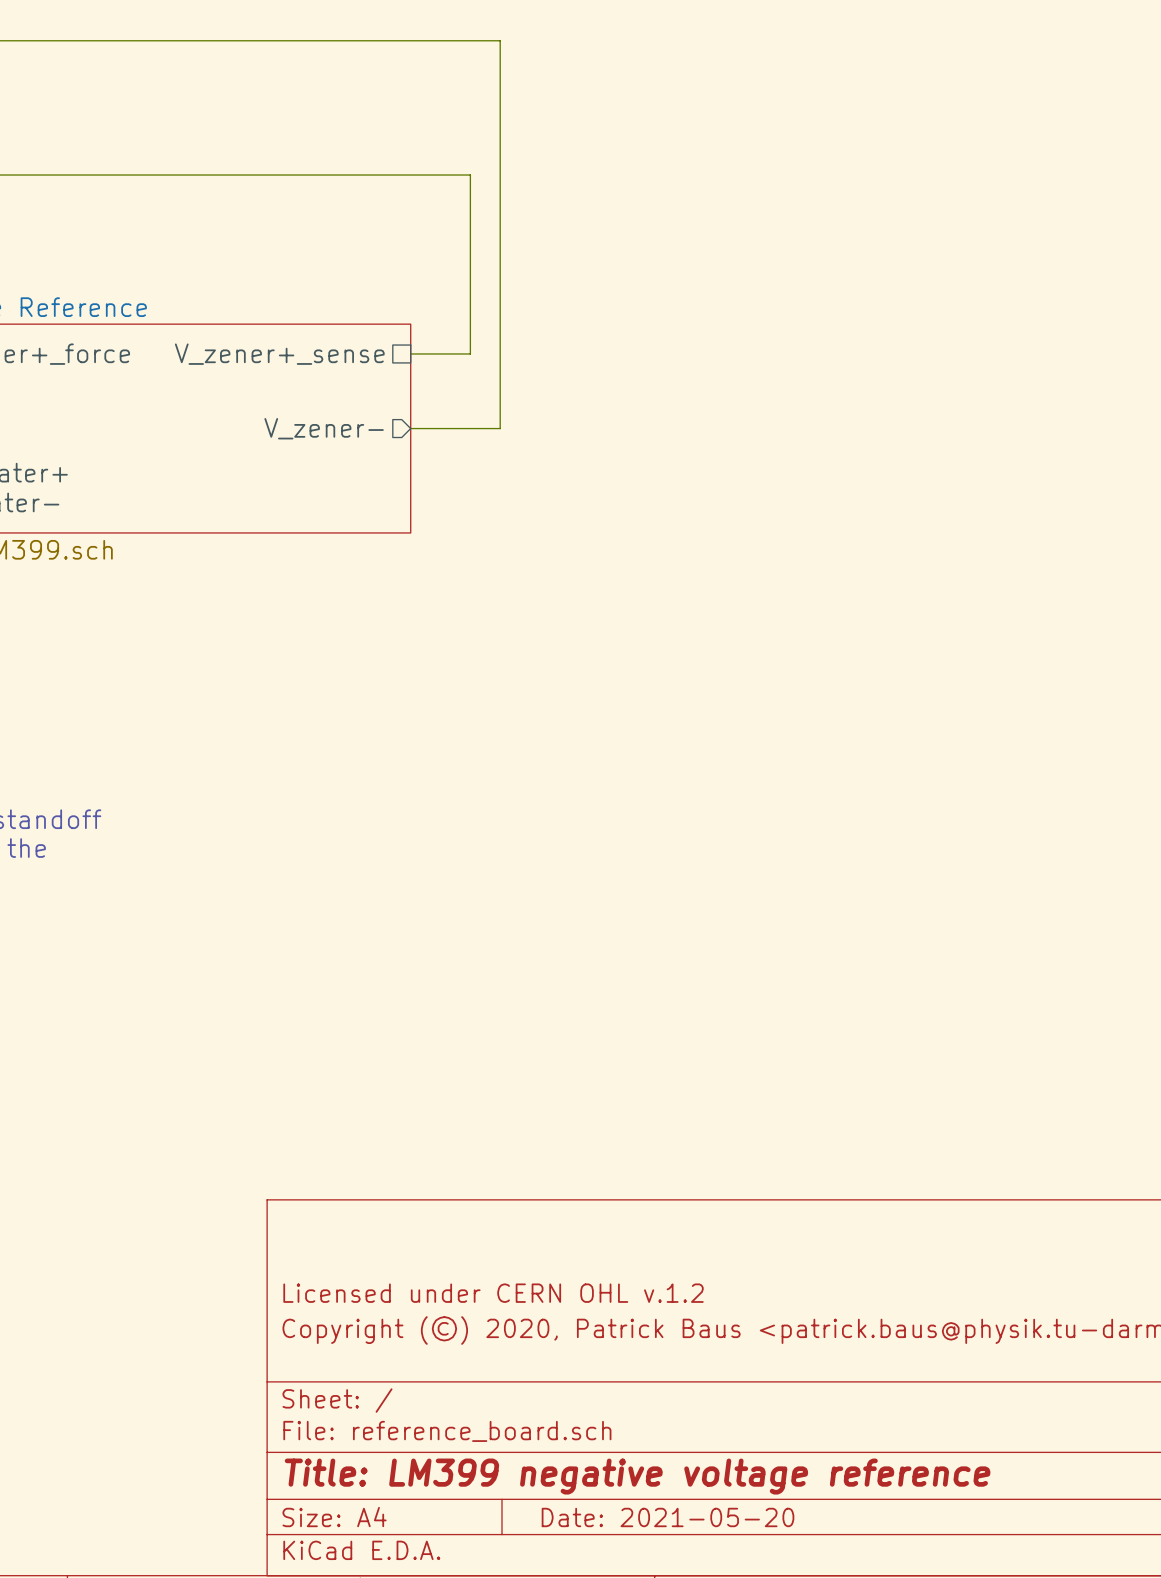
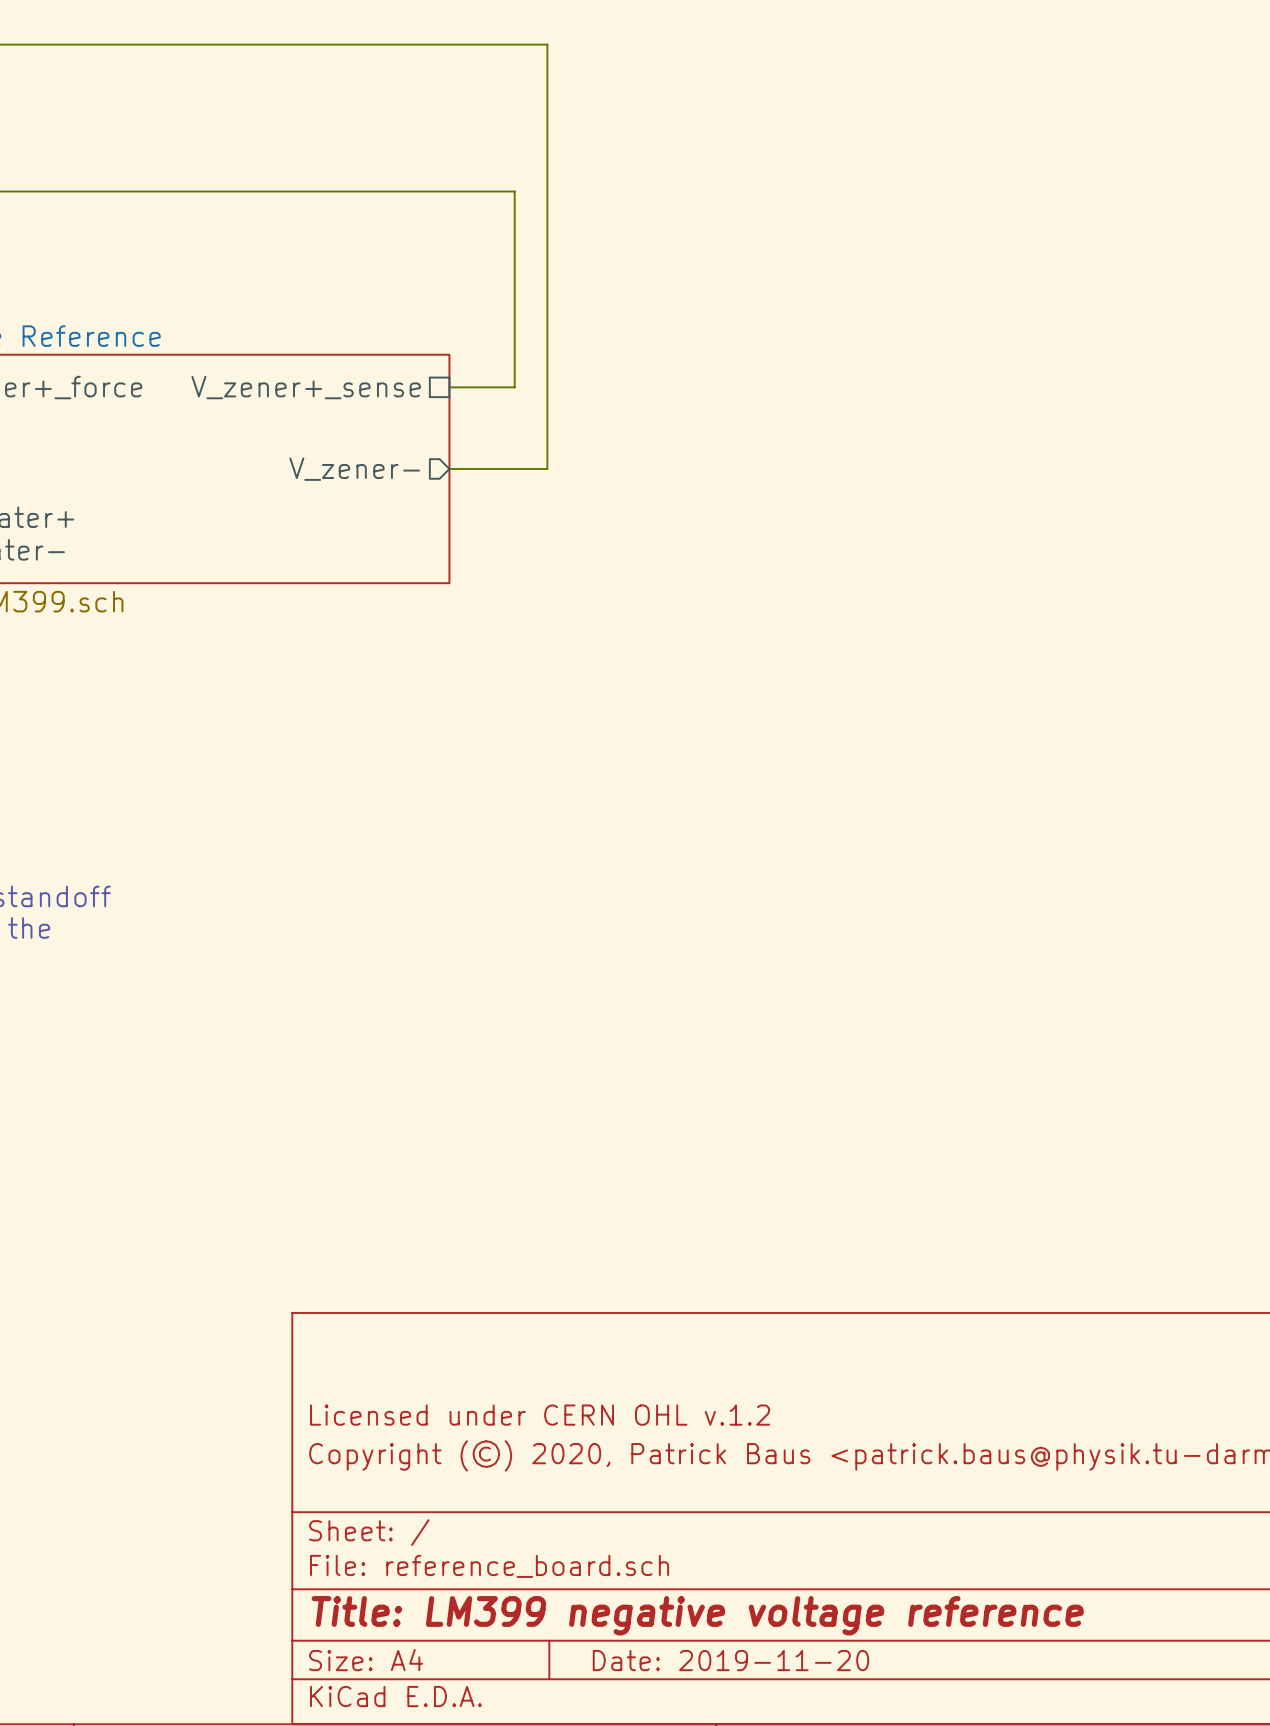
title block: Date: 2021-05-20 (668, 1517) -> Date: 2019-11-20 (730, 1660)

